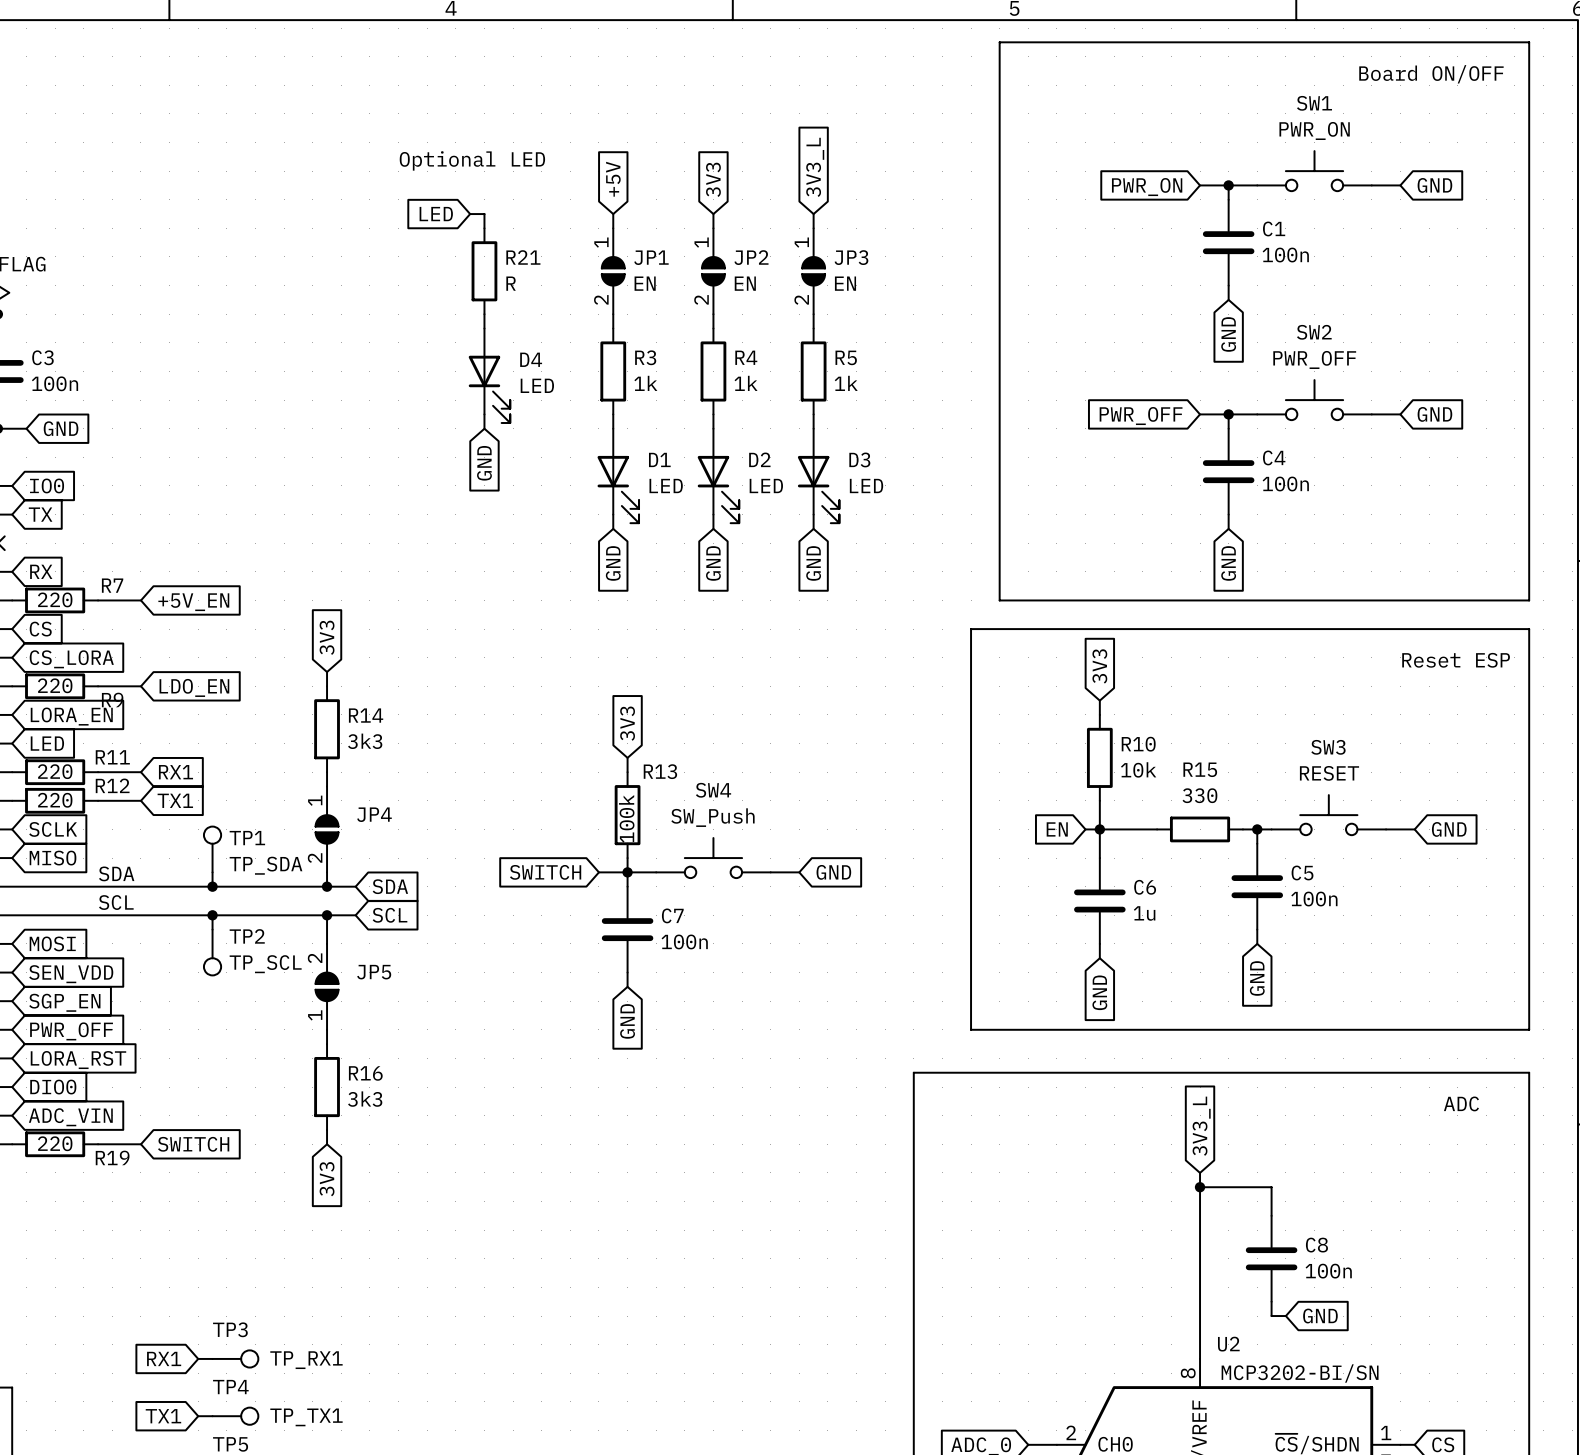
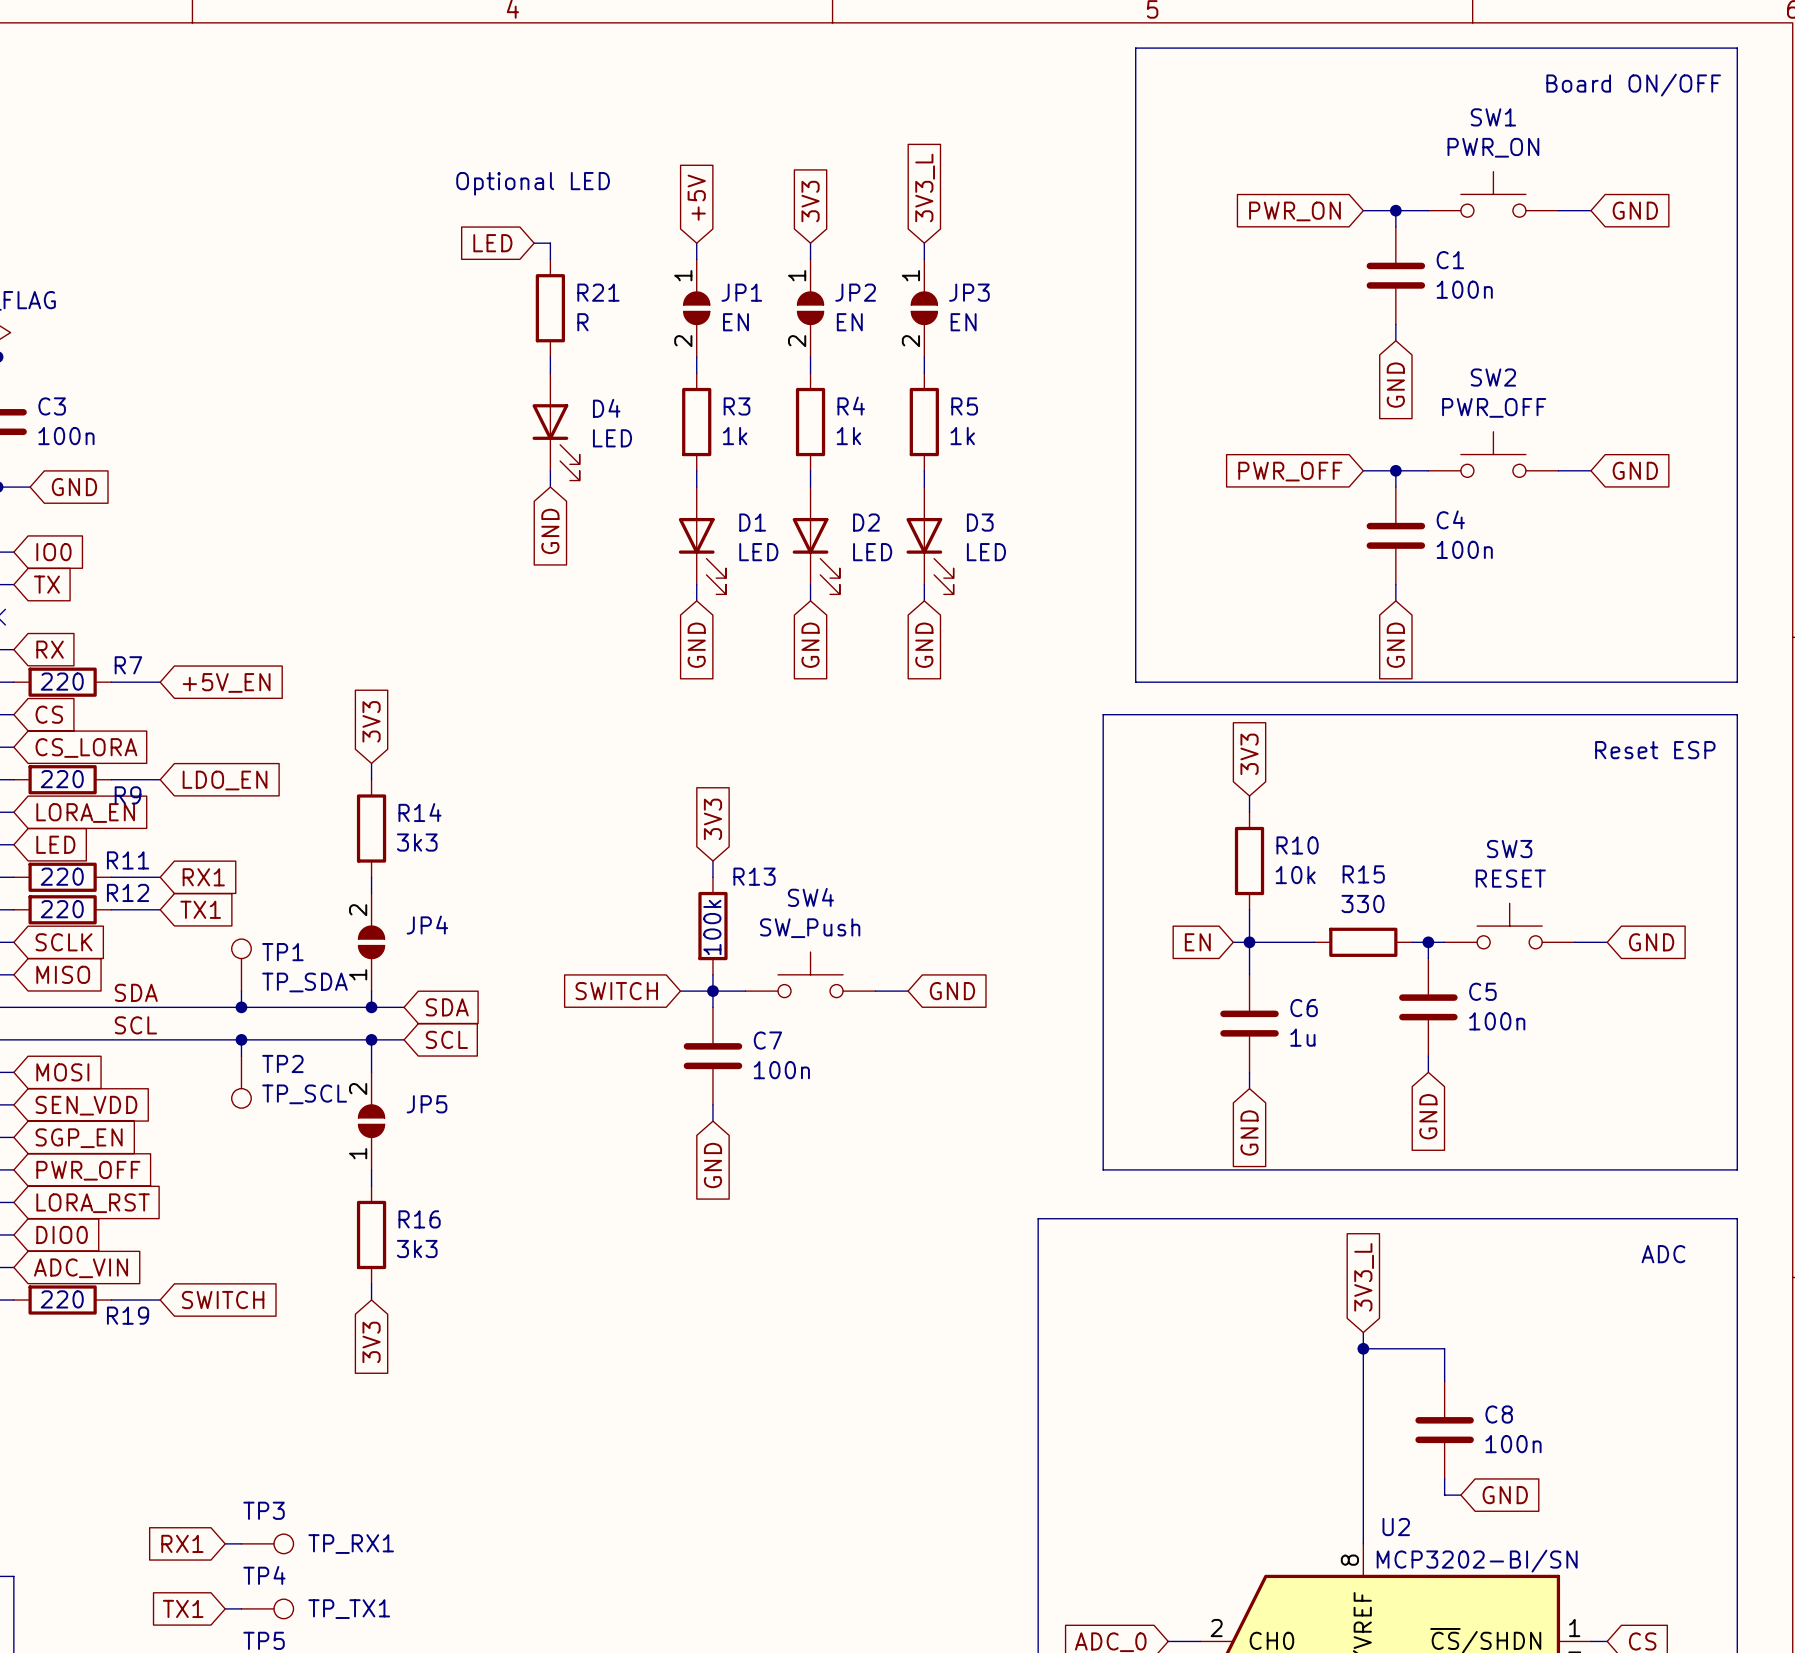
JP4 rotation: 0° (327, 829) -> 180° (371, 942)

